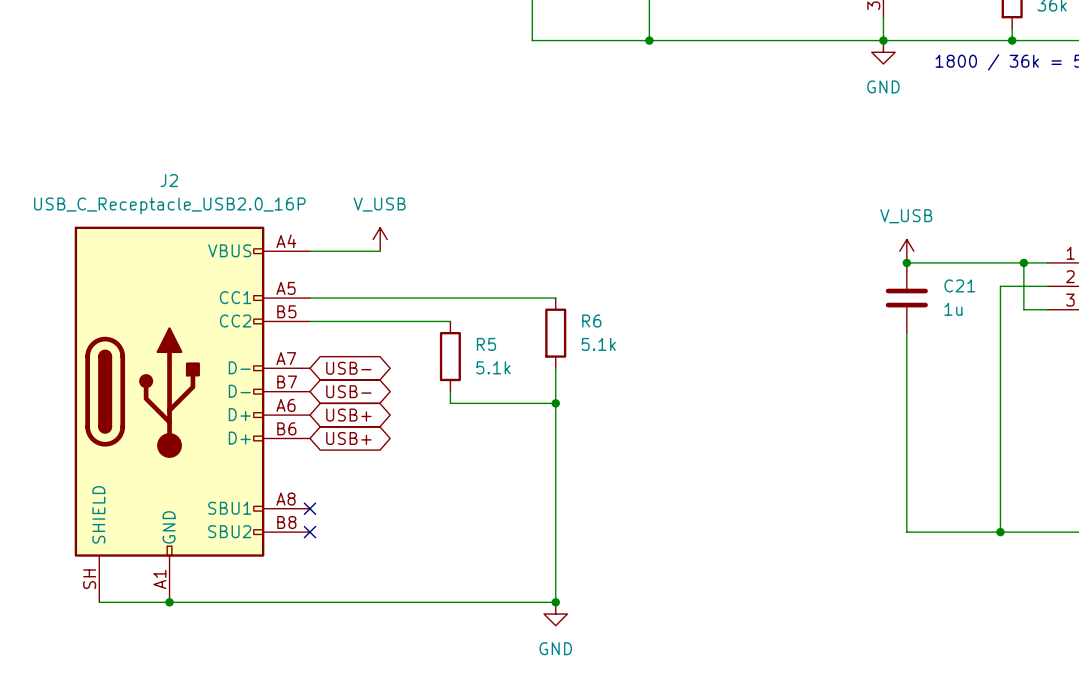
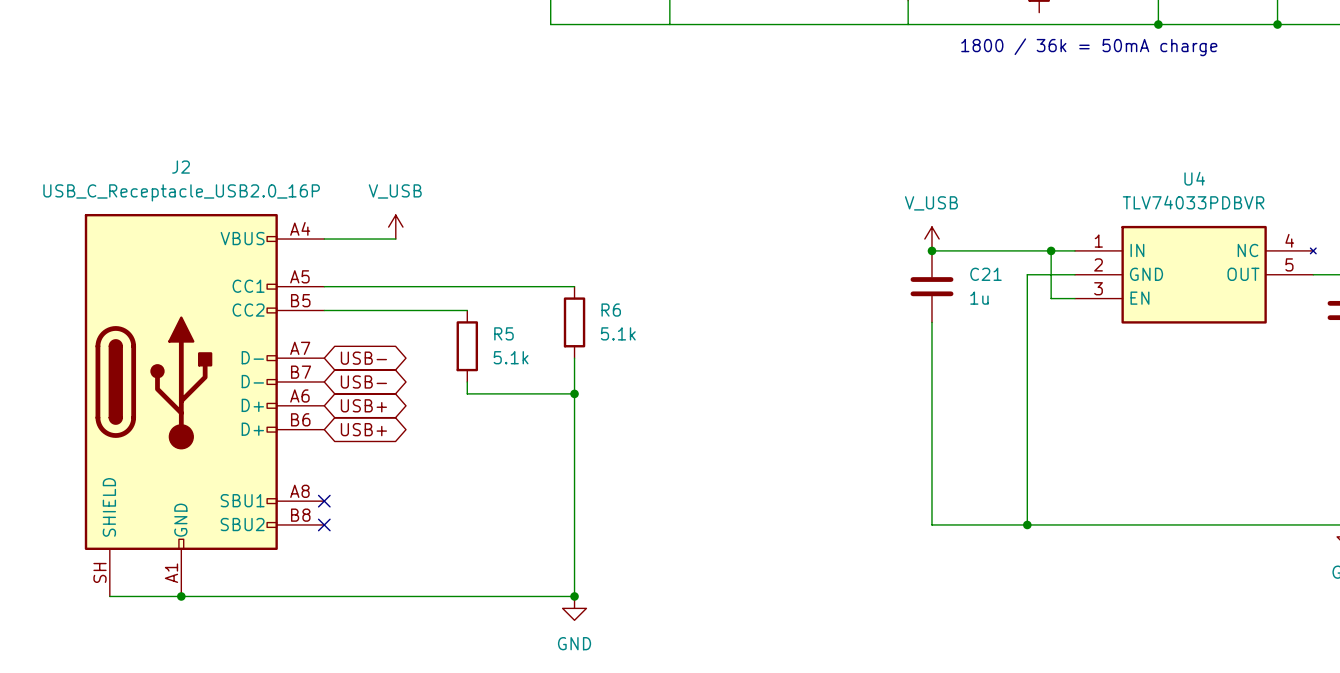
wire: (1012, 28) (1012, 40) -> none
junction: (649, 40) -> none
junction: (883, 40) -> none
junction: (1012, 40) -> none
power symbol: GND (883, 52) -> none

